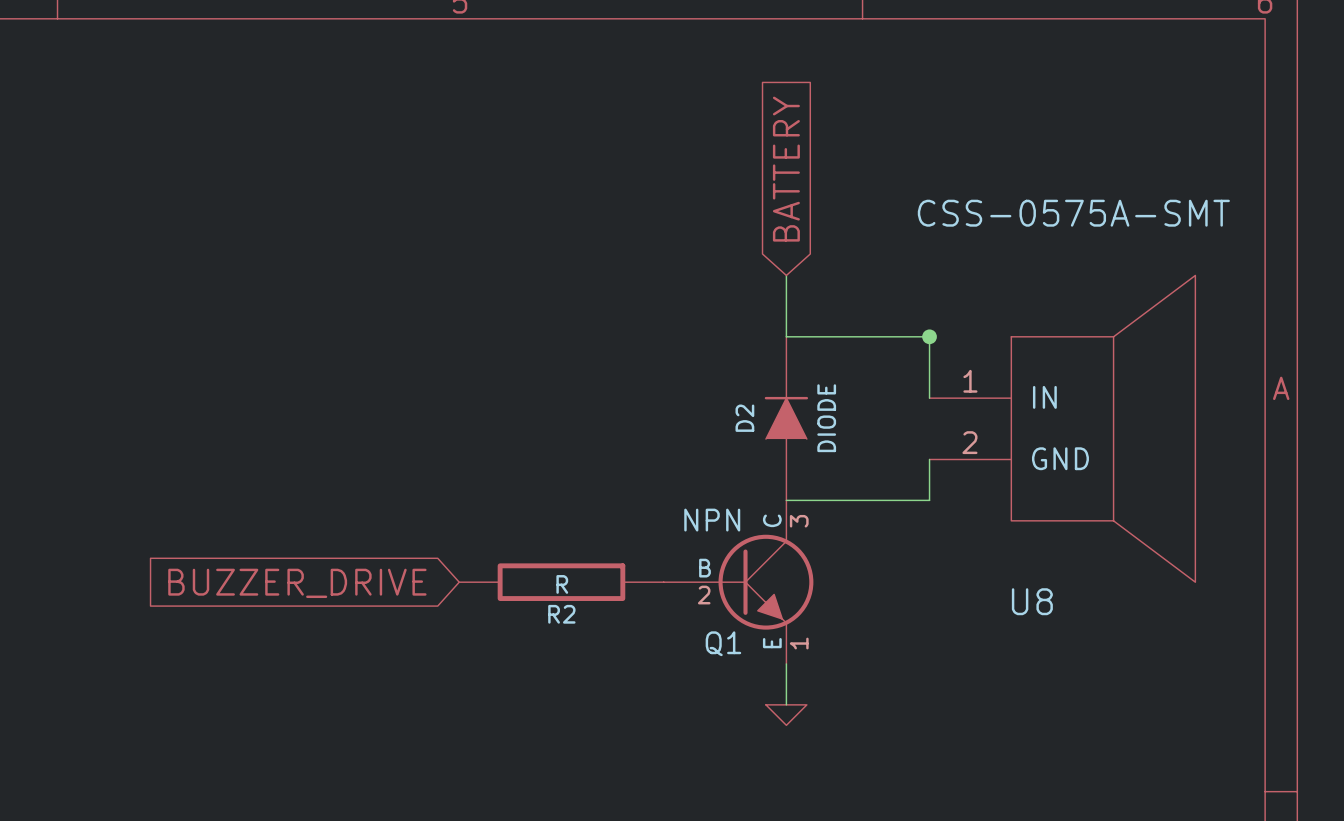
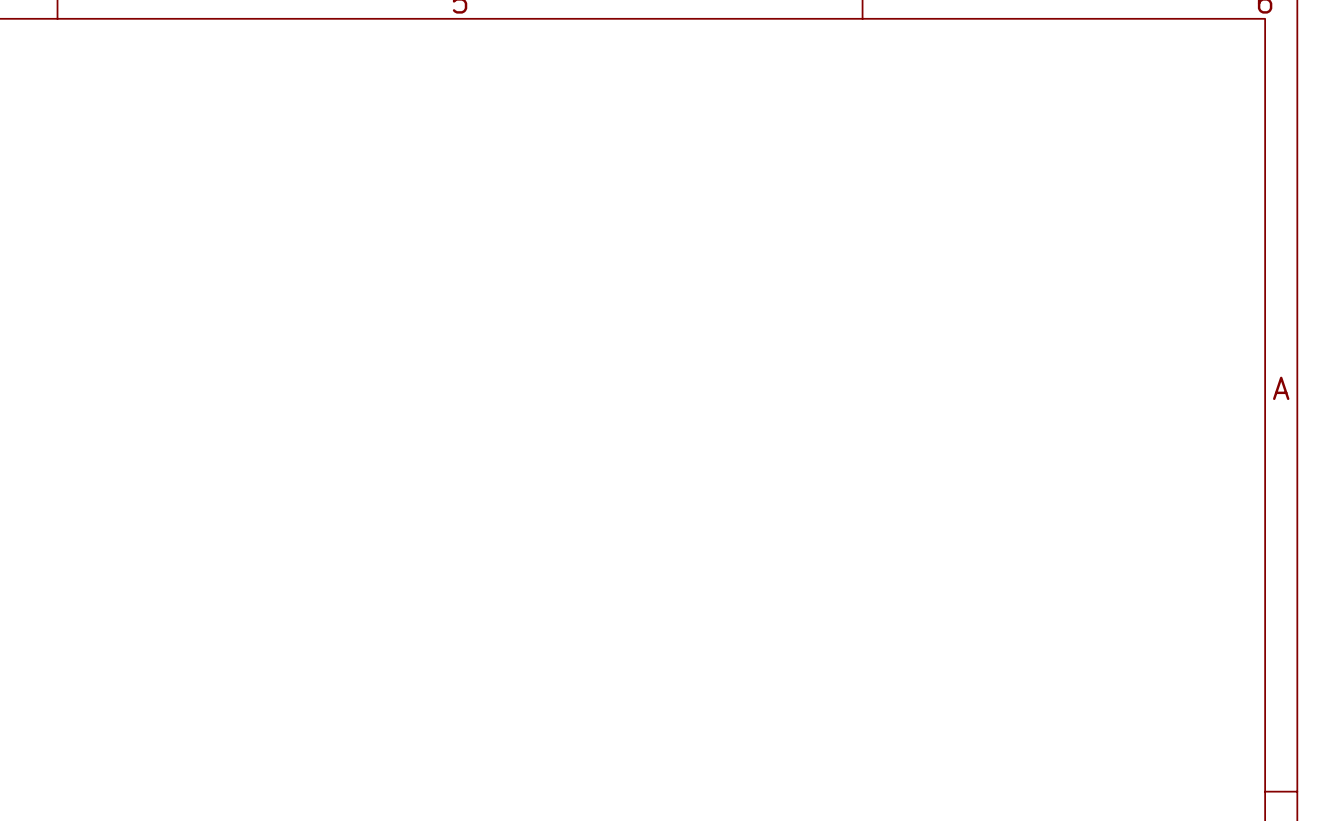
global label: BATTERY (786, 169) -> none
wire: (786, 275) (786, 336) (929, 336) (929, 398) -> none
junction: (929, 336) -> none
D2: DIODE (786, 418) -> none
U8: CSS-0575A-SMT (1062, 428) -> none
wire: (929, 459) (929, 500) (786, 500) -> none
R2: R (561, 582) -> none
Q1: NPN (738, 582) -> none
global label: BUZZER_DRIVE (297, 583) -> none
wire: (786, 663) (786, 704) -> none
power symbol: (786, 715) -> none

